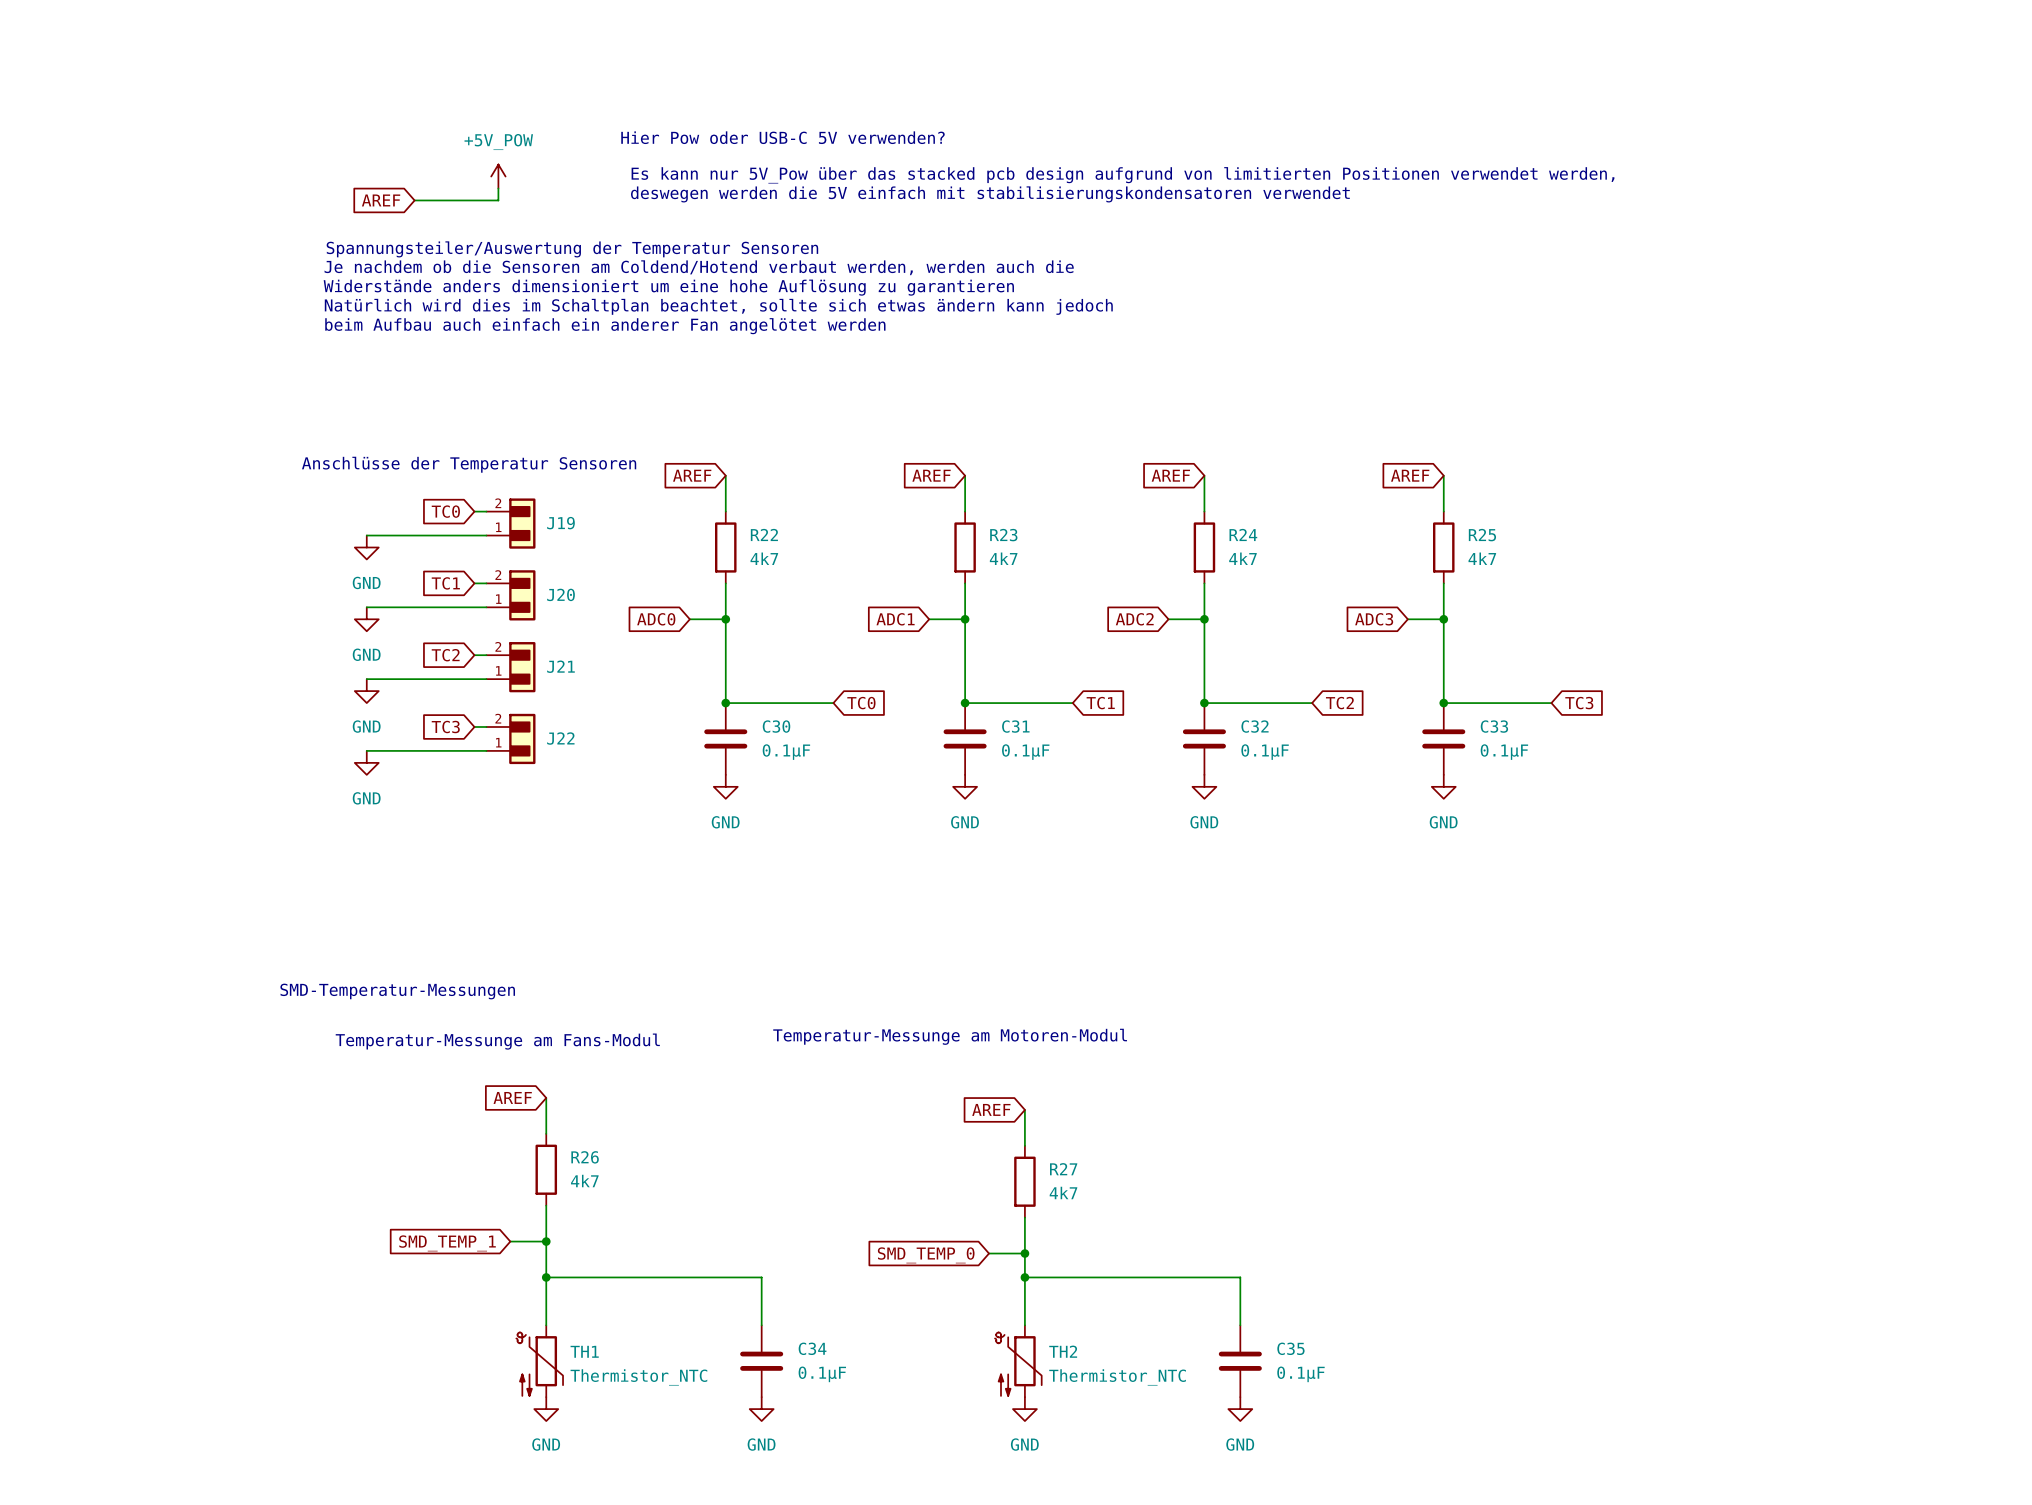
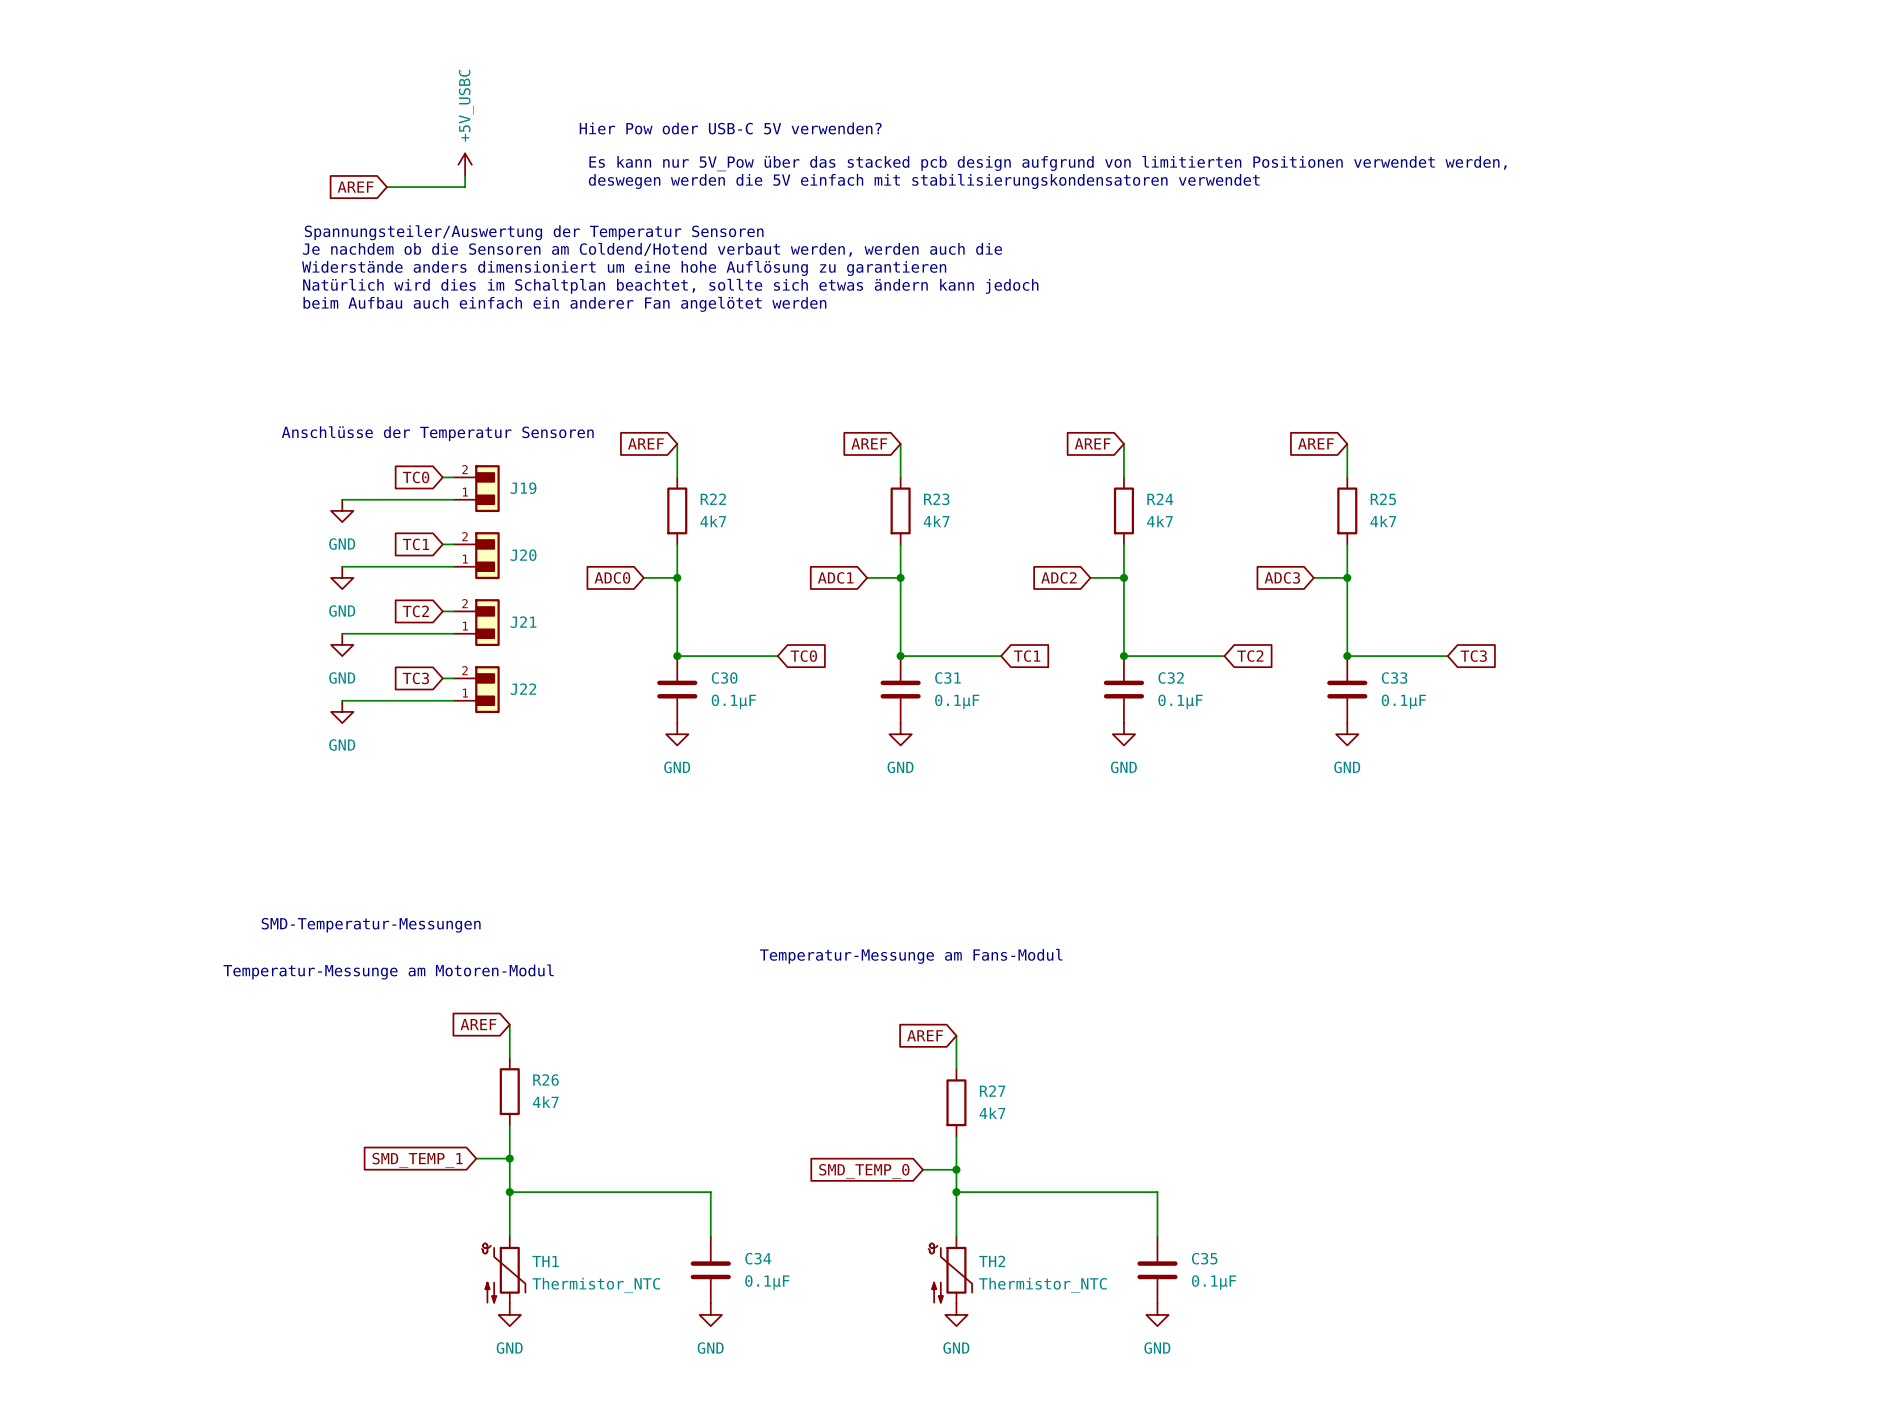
power symbol: +5V_POW (498, 176) -> +5V_USBC (465, 164)
text: Temperatur-Messunge am Motoren-Modul (950, 1036) -> Temperatur-Messunge am Fans-Modul (911, 956)
text: Temperatur-Messunge am Fans-Modul (497, 1041) -> Temperatur-Messunge am Motoren-Modul (388, 971)

